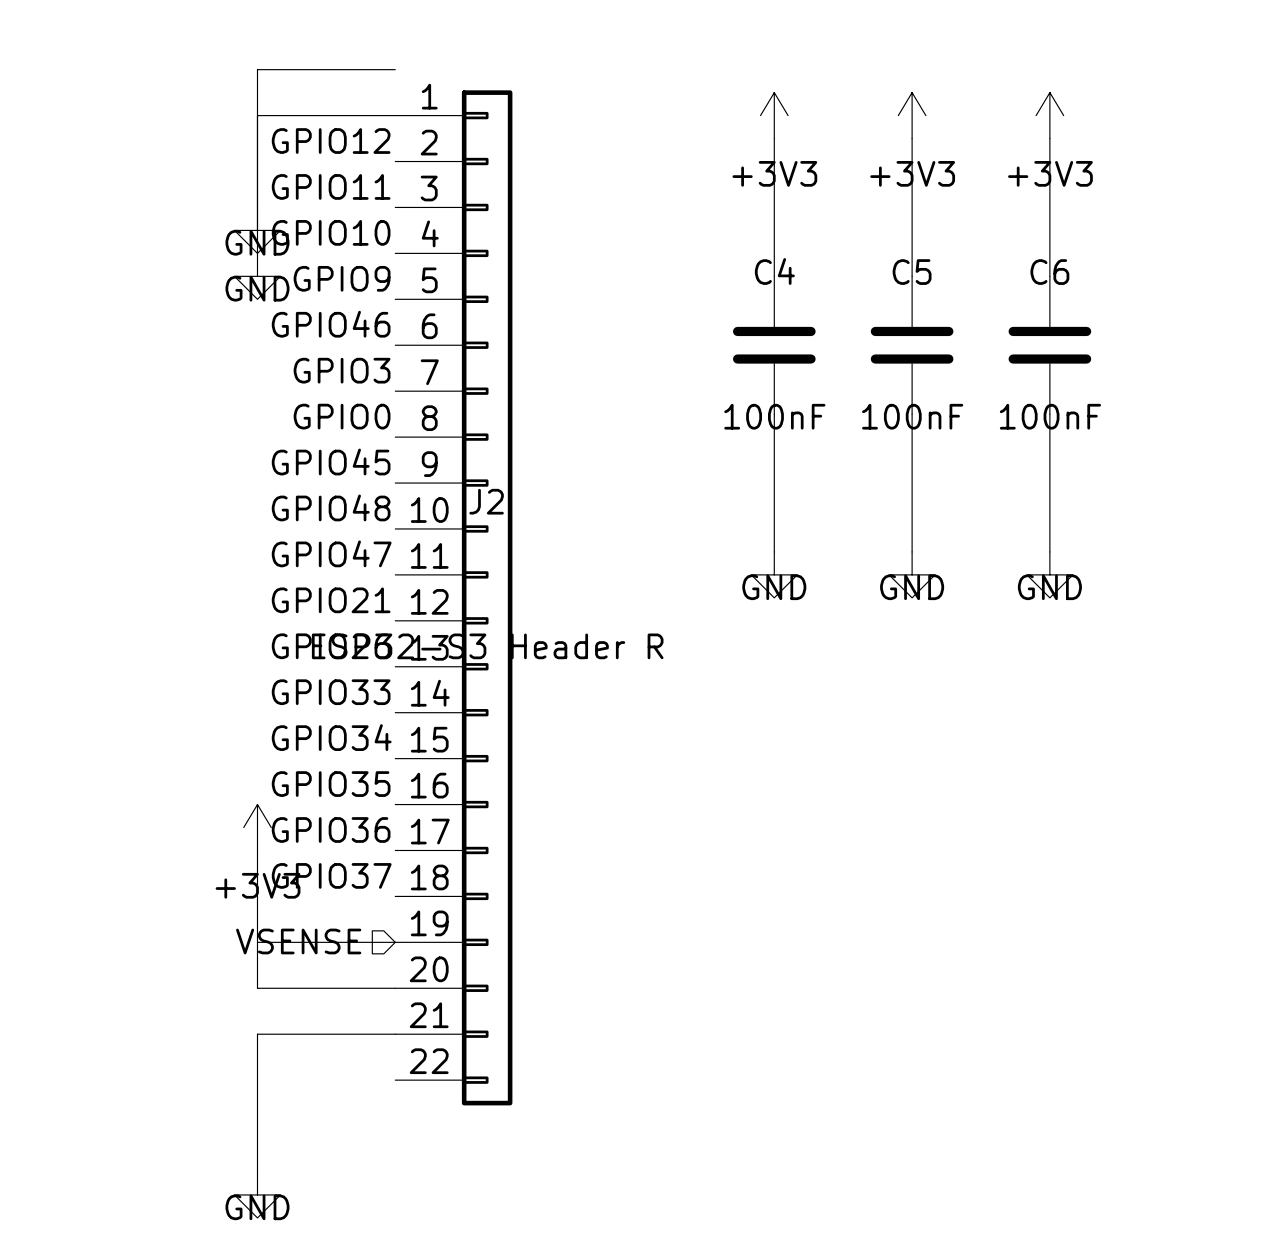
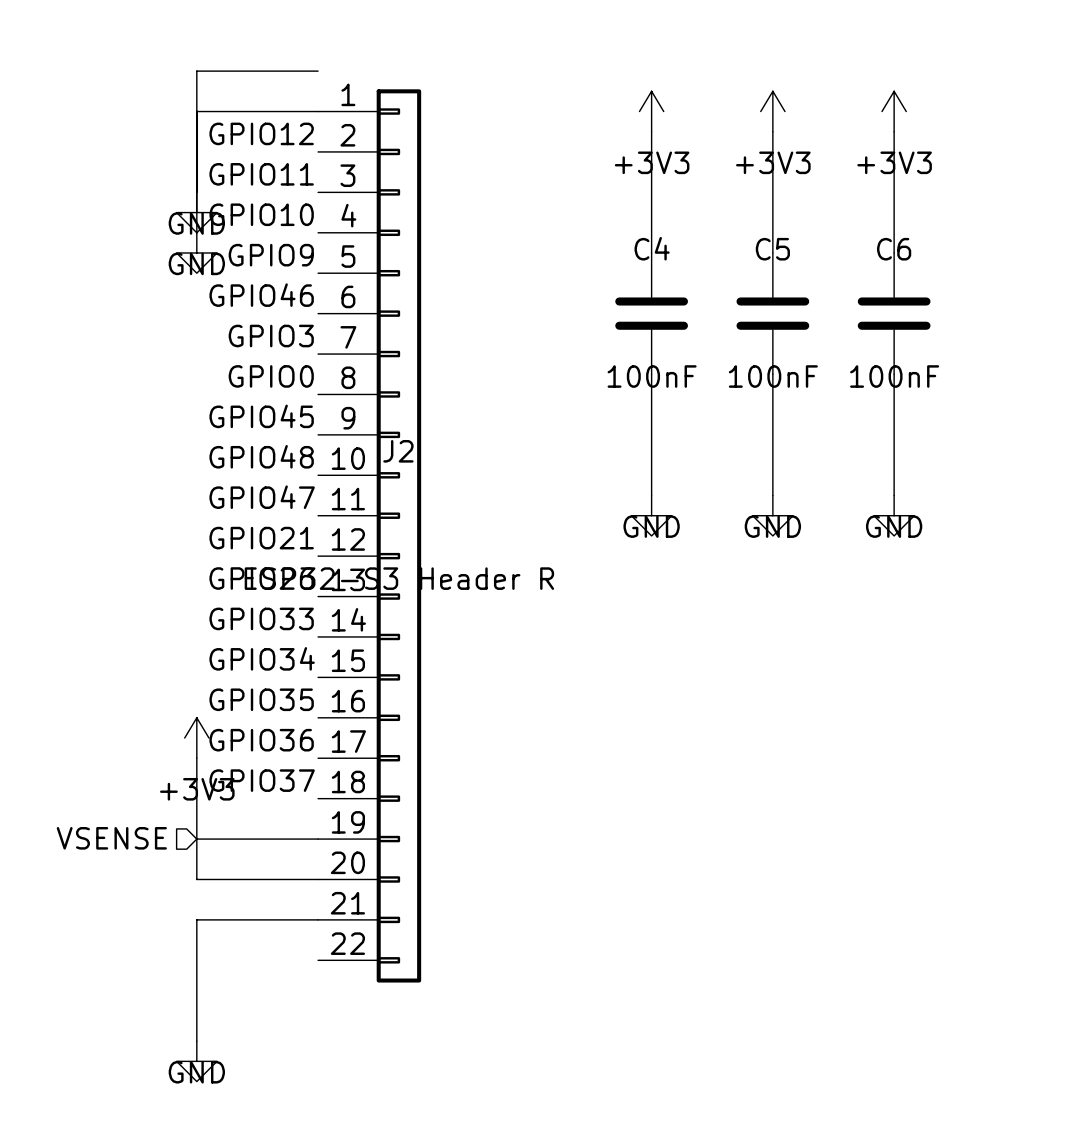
hierarchical label position: VSENSE (298, 941) -> VSENSE (111, 838)

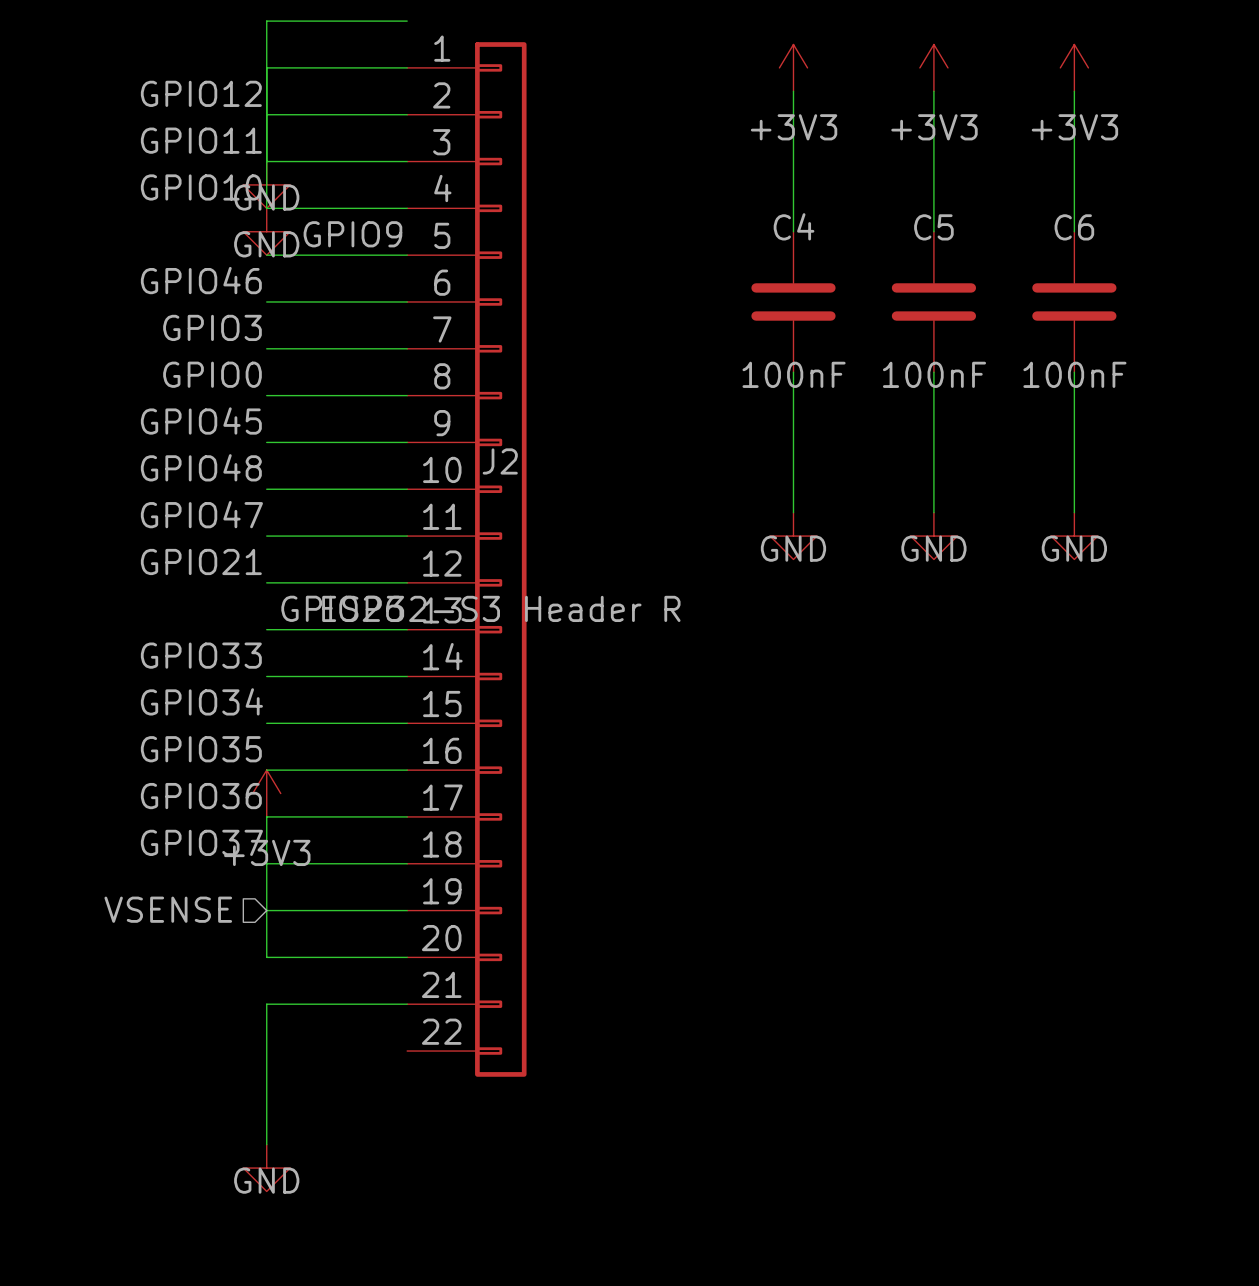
label position: GPIO12 (261, 133) -> GPIO12 (201, 93)
wire: none -> (266, 114) (407, 114)
label position: GPIO11 (261, 174) -> GPIO11 (201, 140)
wire: none -> (266, 161) (407, 161)
label position: GPIO10 (261, 214) -> GPIO10 (201, 187)
wire: none -> (266, 208) (407, 208)
wire: none -> (266, 255) (407, 255)
label position: GPIO46 (261, 295) -> GPIO46 (201, 280)
wire: none -> (266, 301) (407, 301)
label position: GPIO3 (271, 336) -> GPIO3 (212, 327)
wire: none -> (266, 348) (407, 348)
label position: GPIO0 (271, 376) -> GPIO0 (212, 374)
wire: none -> (266, 395) (407, 395)
label position: GPIO45 (261, 416) -> GPIO45 (201, 420)
wire: none -> (266, 442) (407, 442)
label position: GPIO48 (261, 456) -> GPIO48 (201, 467)
wire: none -> (266, 489) (407, 489)
label position: GPIO47 (262, 497) -> GPIO47 (201, 514)
wire: none -> (266, 536) (407, 536)
label position: GPIO21 (261, 538) -> GPIO21 (201, 561)
wire: none -> (266, 582) (407, 582)
wire: none -> (266, 629) (407, 629)
label position: GPIO33 (261, 618) -> GPIO33 (201, 655)
wire: none -> (266, 676) (407, 676)
label position: GPIO34 (262, 658) -> GPIO34 (201, 701)
wire: none -> (266, 723) (407, 723)
label position: GPIO35 (261, 699) -> GPIO35 (201, 749)
wire: none -> (266, 770) (407, 770)
label position: GPIO36 (261, 740) -> GPIO36 (201, 796)
wire: none -> (266, 816) (407, 816)
label position: GPIO37 (262, 780) -> GPIO37 (201, 842)
wire: none -> (266, 863) (407, 863)

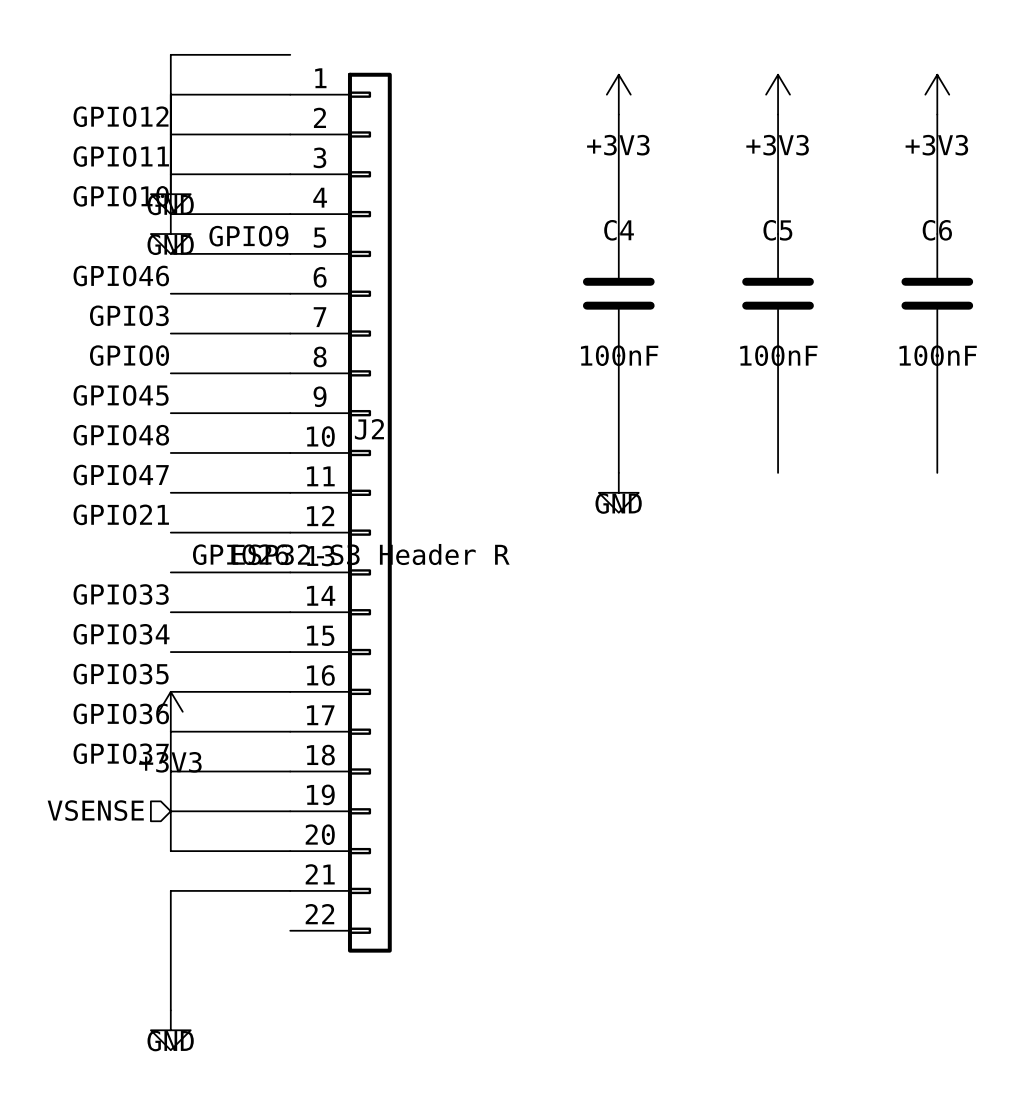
power symbol: +3V3 (933, 67) -> none
power symbol: none -> +3V3 (778, 94)
power symbol: +3V3 (1074, 67) -> none
power symbol: none -> +3V3 (937, 94)
wire: (933, 91) (933, 231) -> (778, 114) (778, 234)
wire: (1074, 91) (1074, 231) -> (937, 114) (937, 234)
C5 position: (933, 301) -> (778, 293)
C6 position: (1074, 301) -> (937, 293)
wire: (933, 372) (933, 512) -> (778, 353) (778, 472)
wire: (1074, 372) (1074, 512) -> (937, 353) (937, 472)
power symbol: GND (933, 536) -> none
power symbol: GND (1074, 536) -> none

